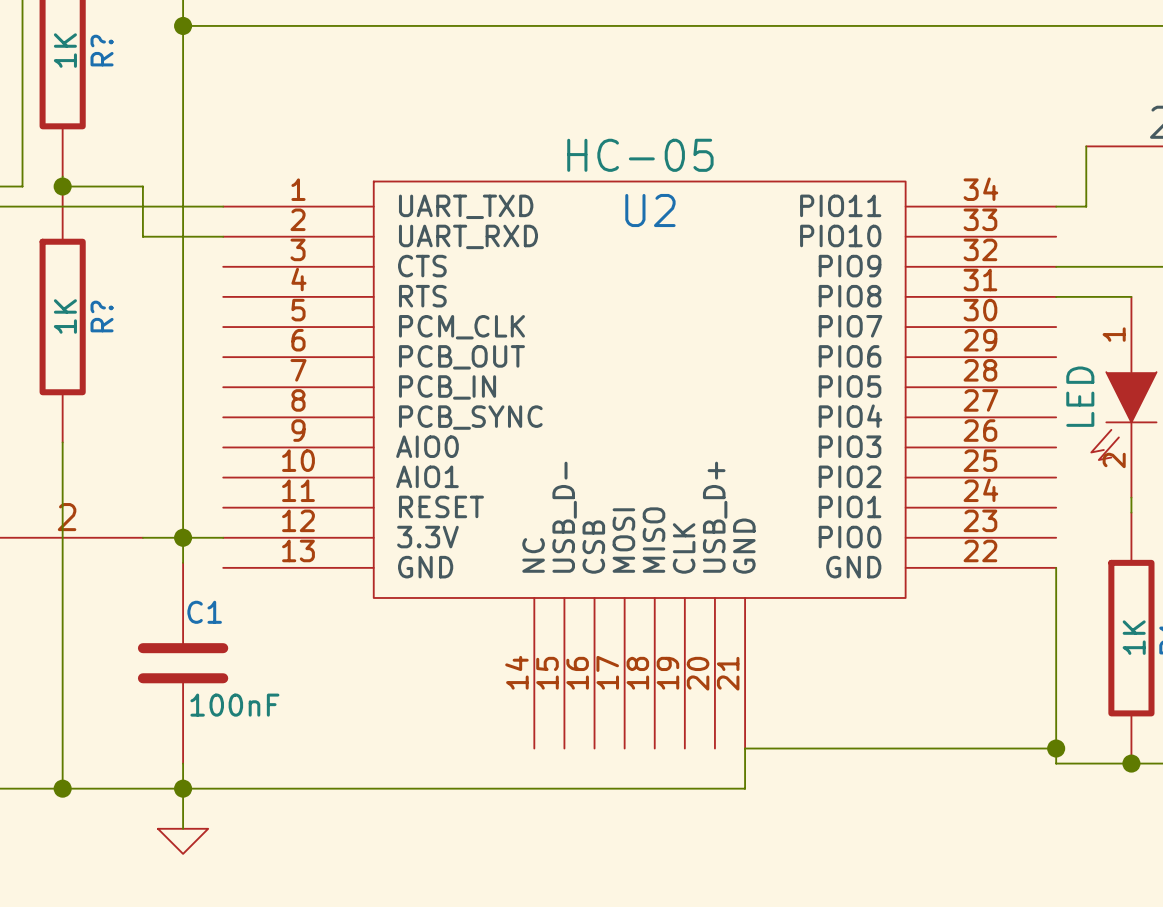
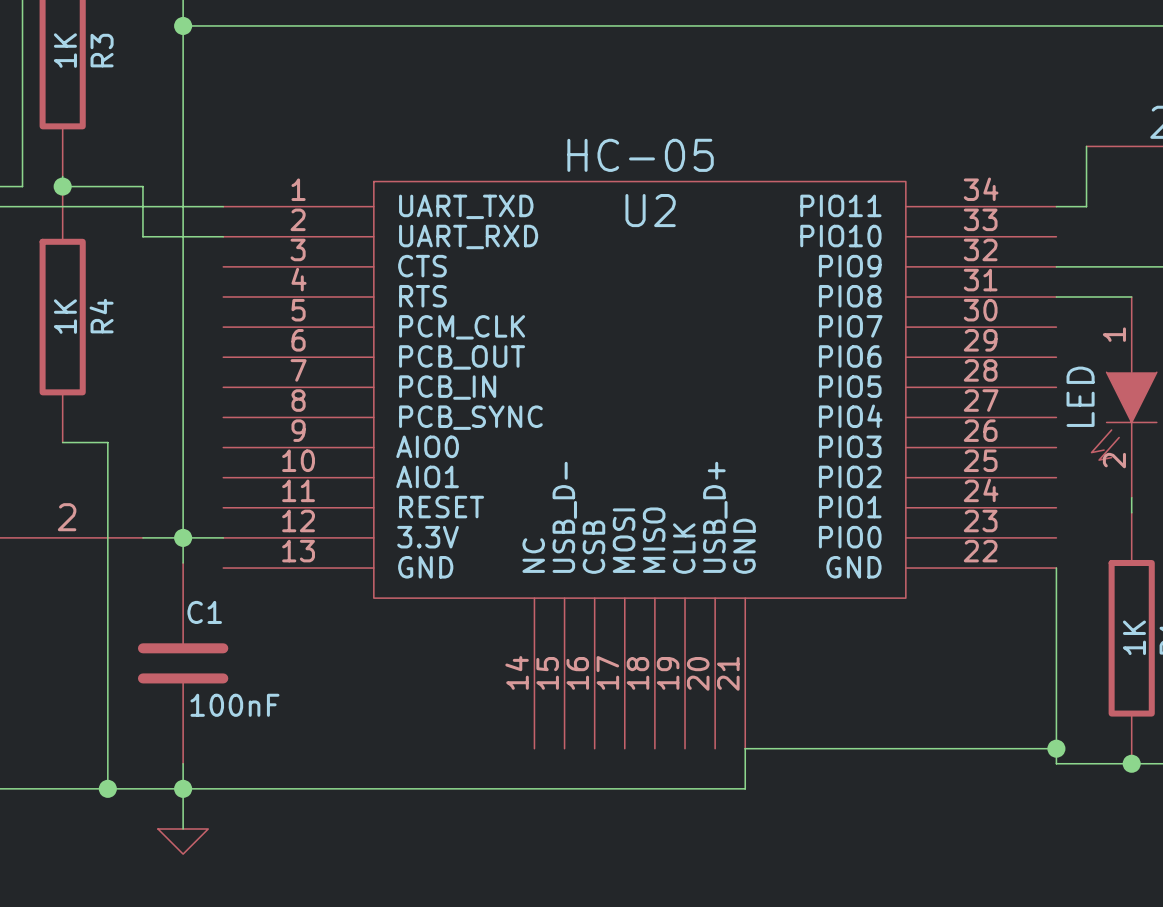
R? name: R? (102, 50) -> R3 (102, 50)
R? name: R? (102, 316) -> R4 (101, 316)
wire: (62, 442) (62, 788) -> (62, 442) (107, 442) (107, 788)
junction position: (62, 788) -> (107, 788)

